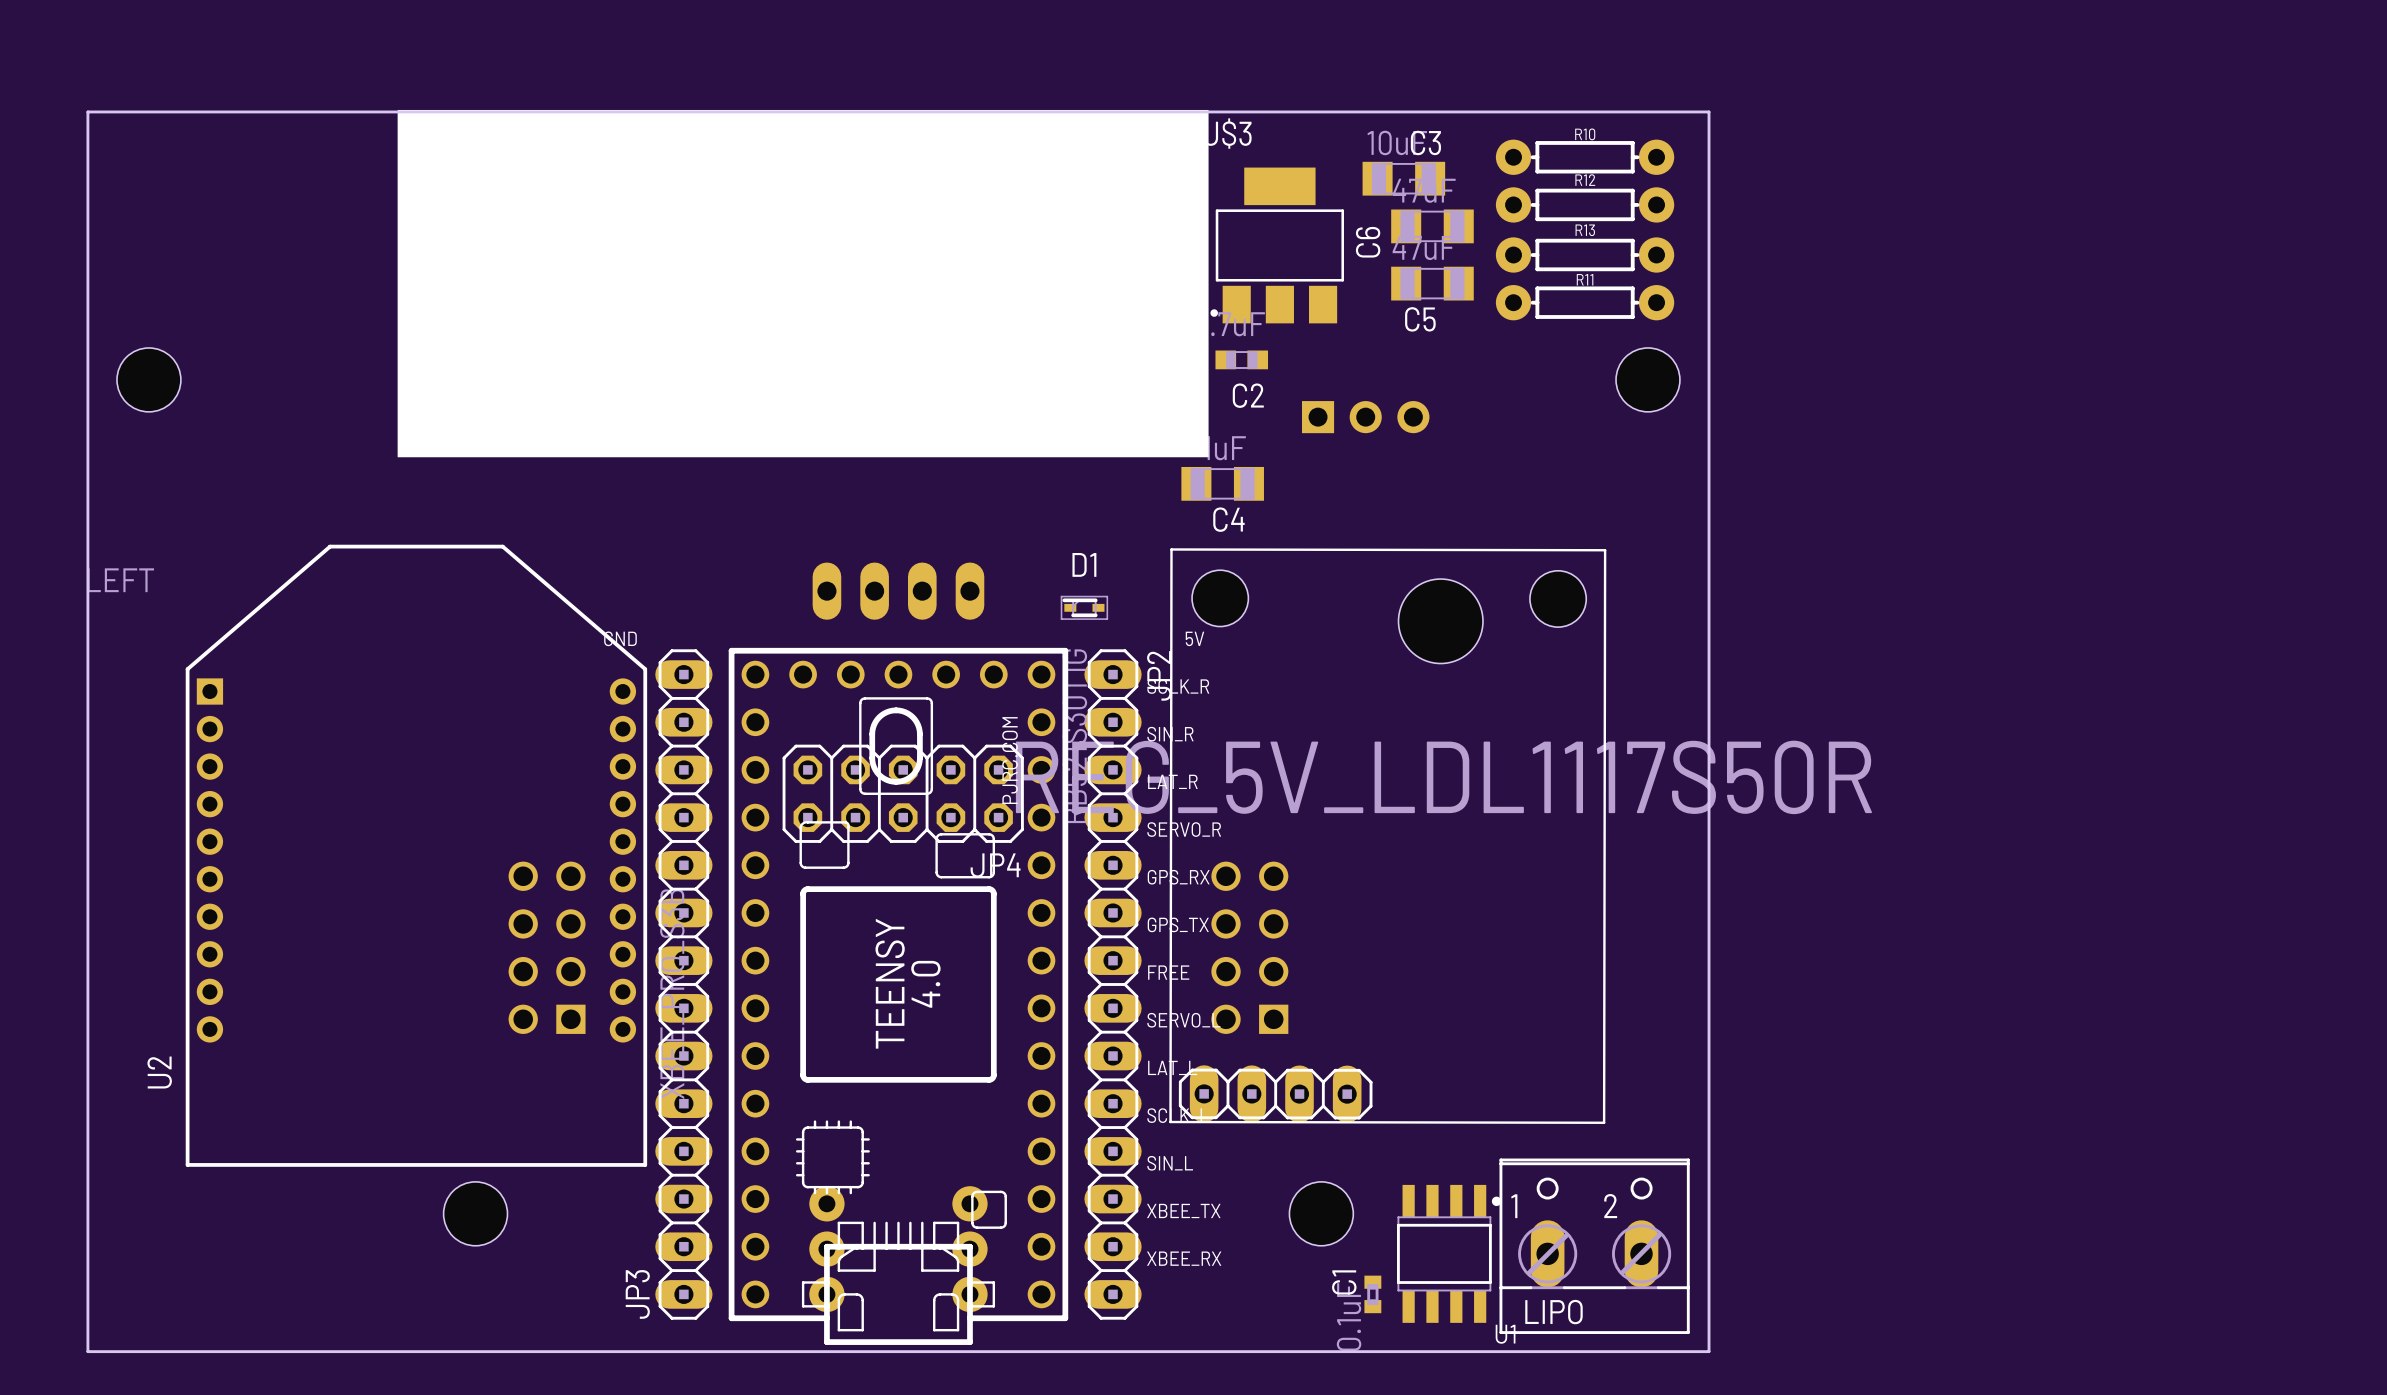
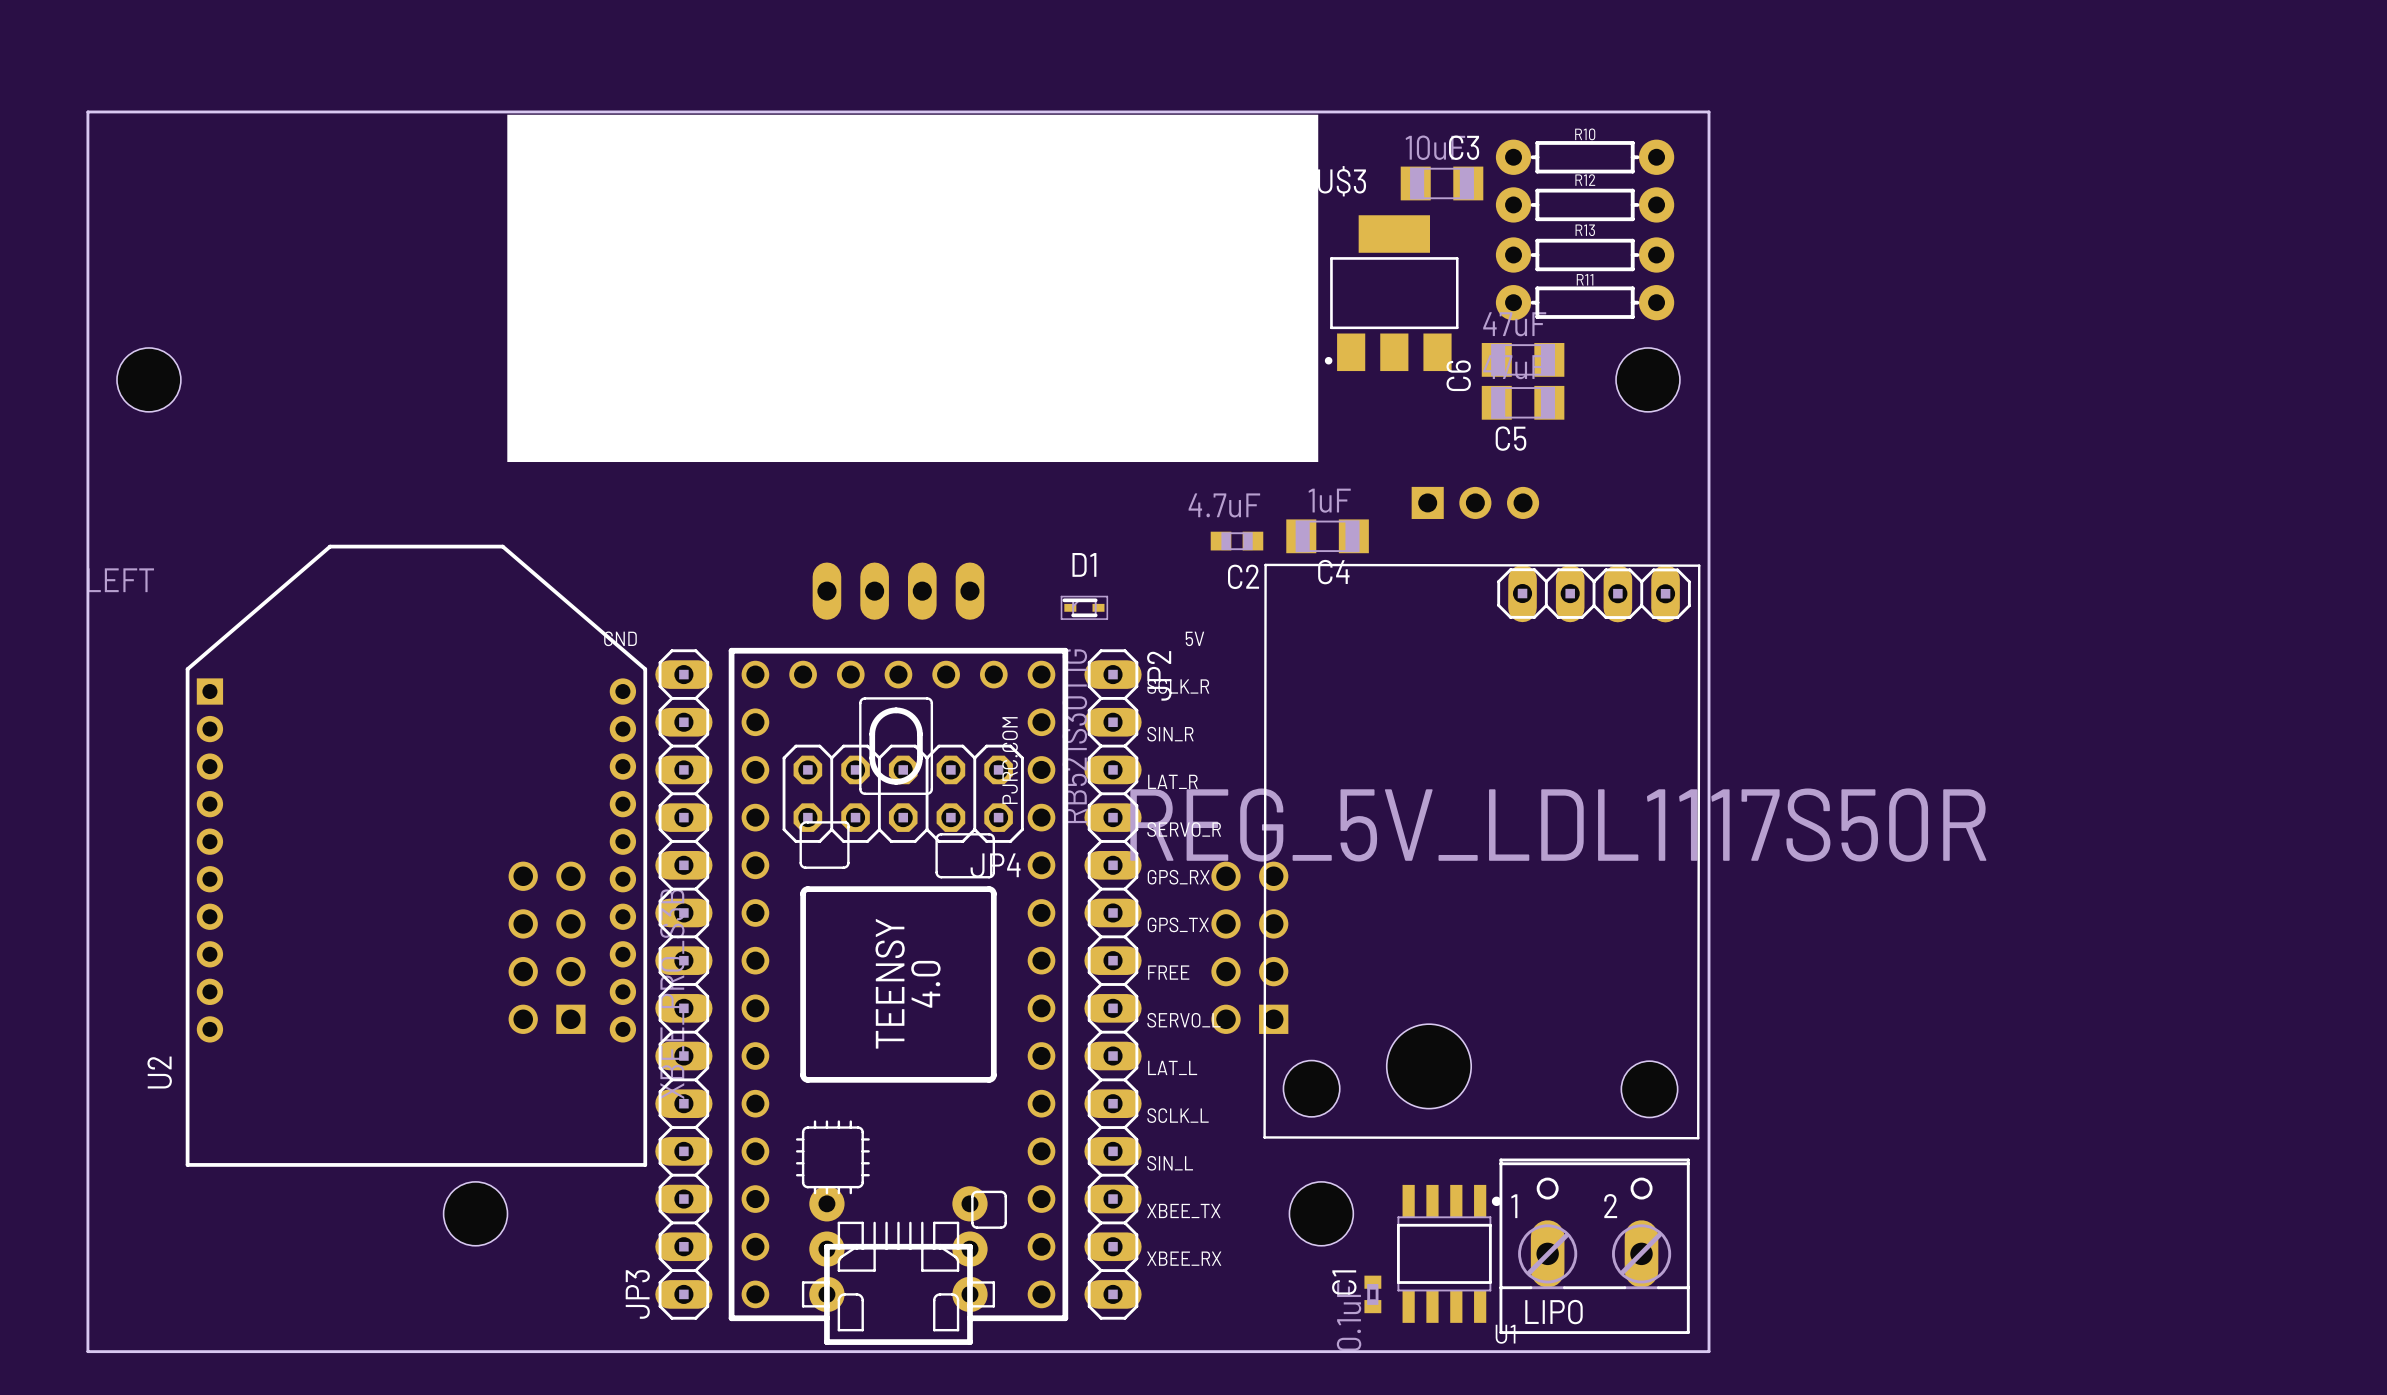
C3 position: (1403, 178) -> (1442, 183)
C6 position: (1432, 226) -> (1523, 359)
U$3 position: (1277, 245) -> (1391, 293)
part position: (803, 283) -> (912, 288)
C5 position: (1432, 283) -> (1523, 402)
C2 position: (1241, 359) -> (1236, 541)
part position: (1365, 417) -> (1475, 502)
C4 position: (1222, 483) -> (1327, 536)
part rotation: 0° (1387, 836) -> 180° (1481, 851)

